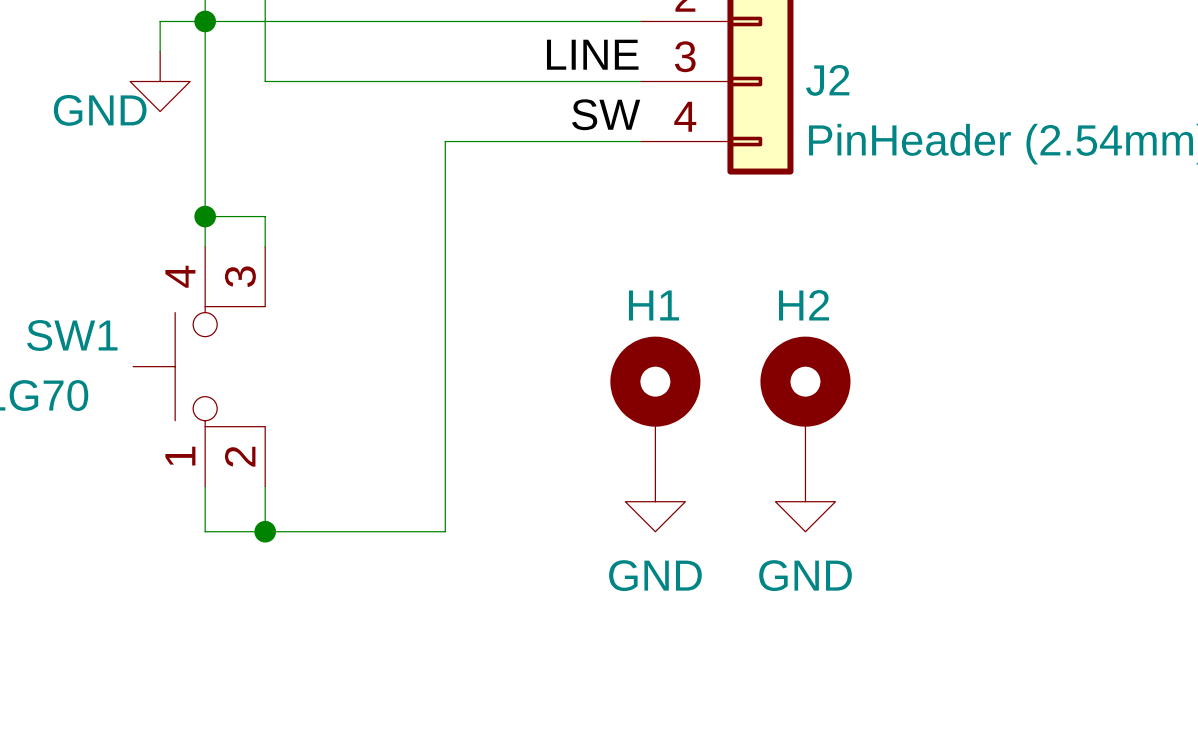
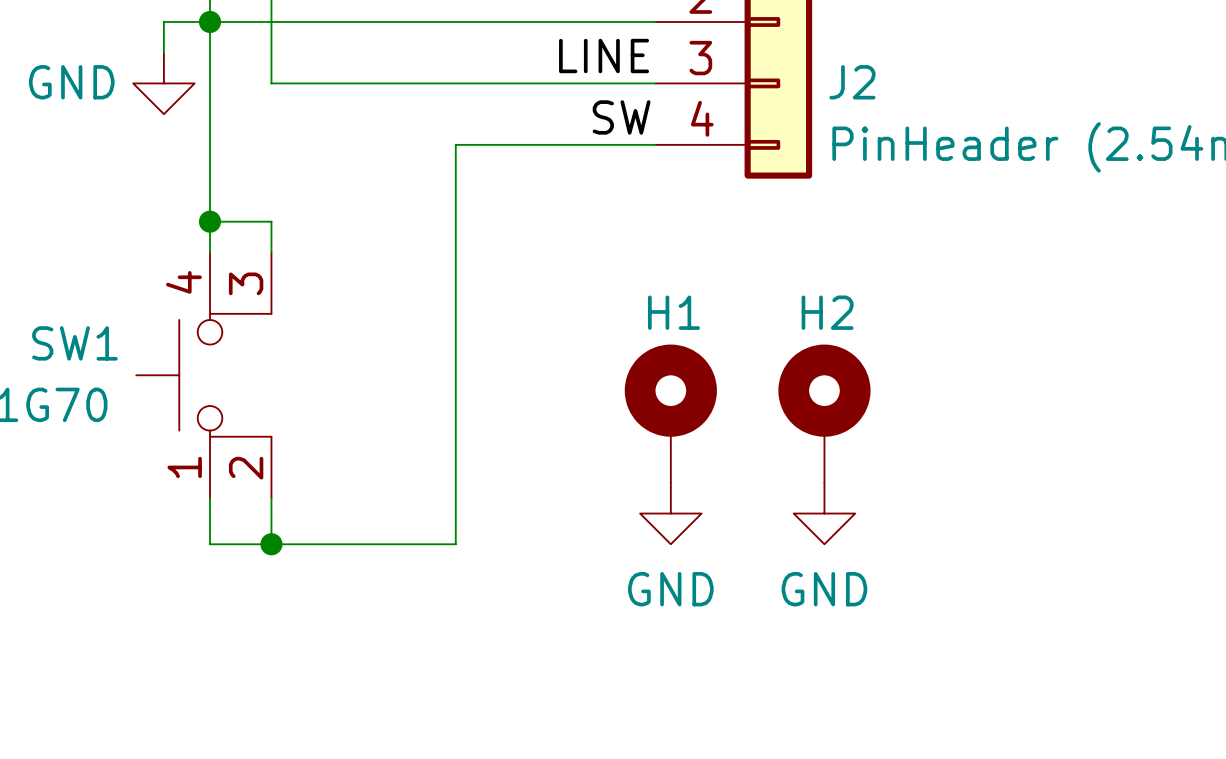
power symbol text position: GND (100, 110) -> GND (71, 82)

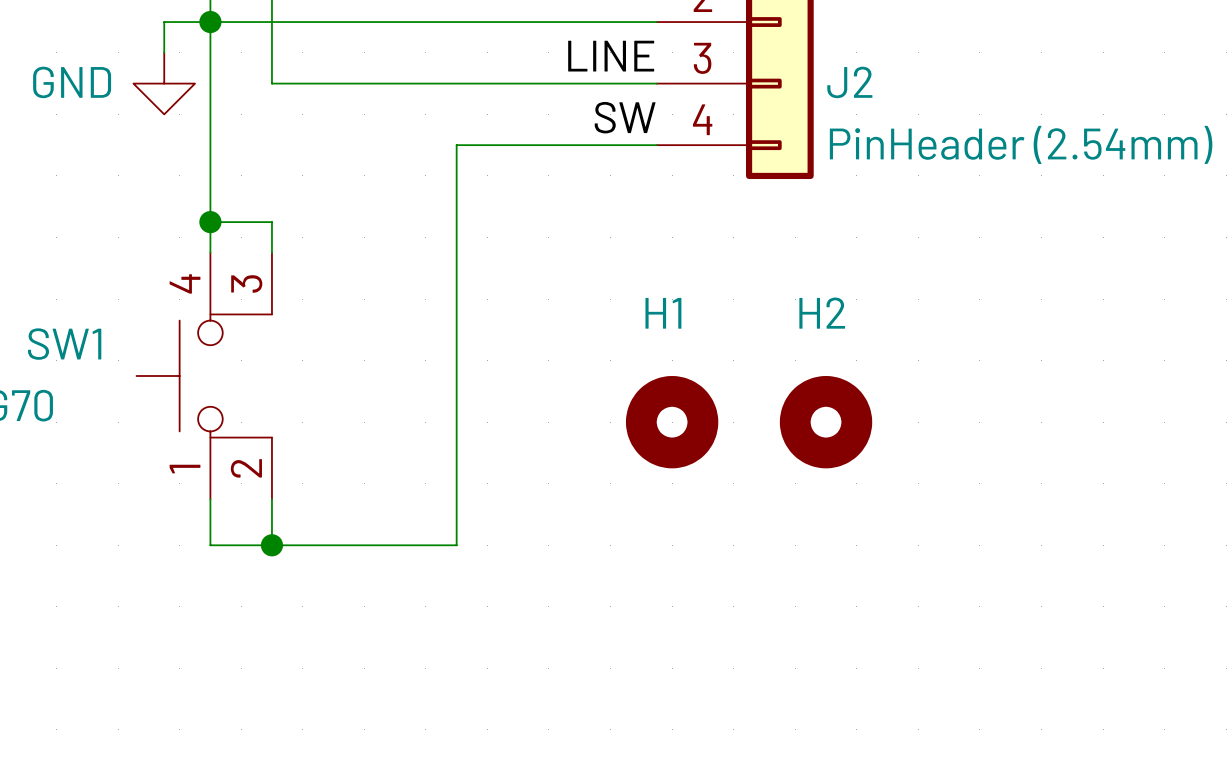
H1 symbol: [624, 344, 717, 483] -> [625, 376, 719, 469]
H2 symbol: [778, 344, 871, 483] -> [779, 376, 873, 469]
power symbol: GND (670, 513) -> none
power symbol: GND (824, 513) -> none

